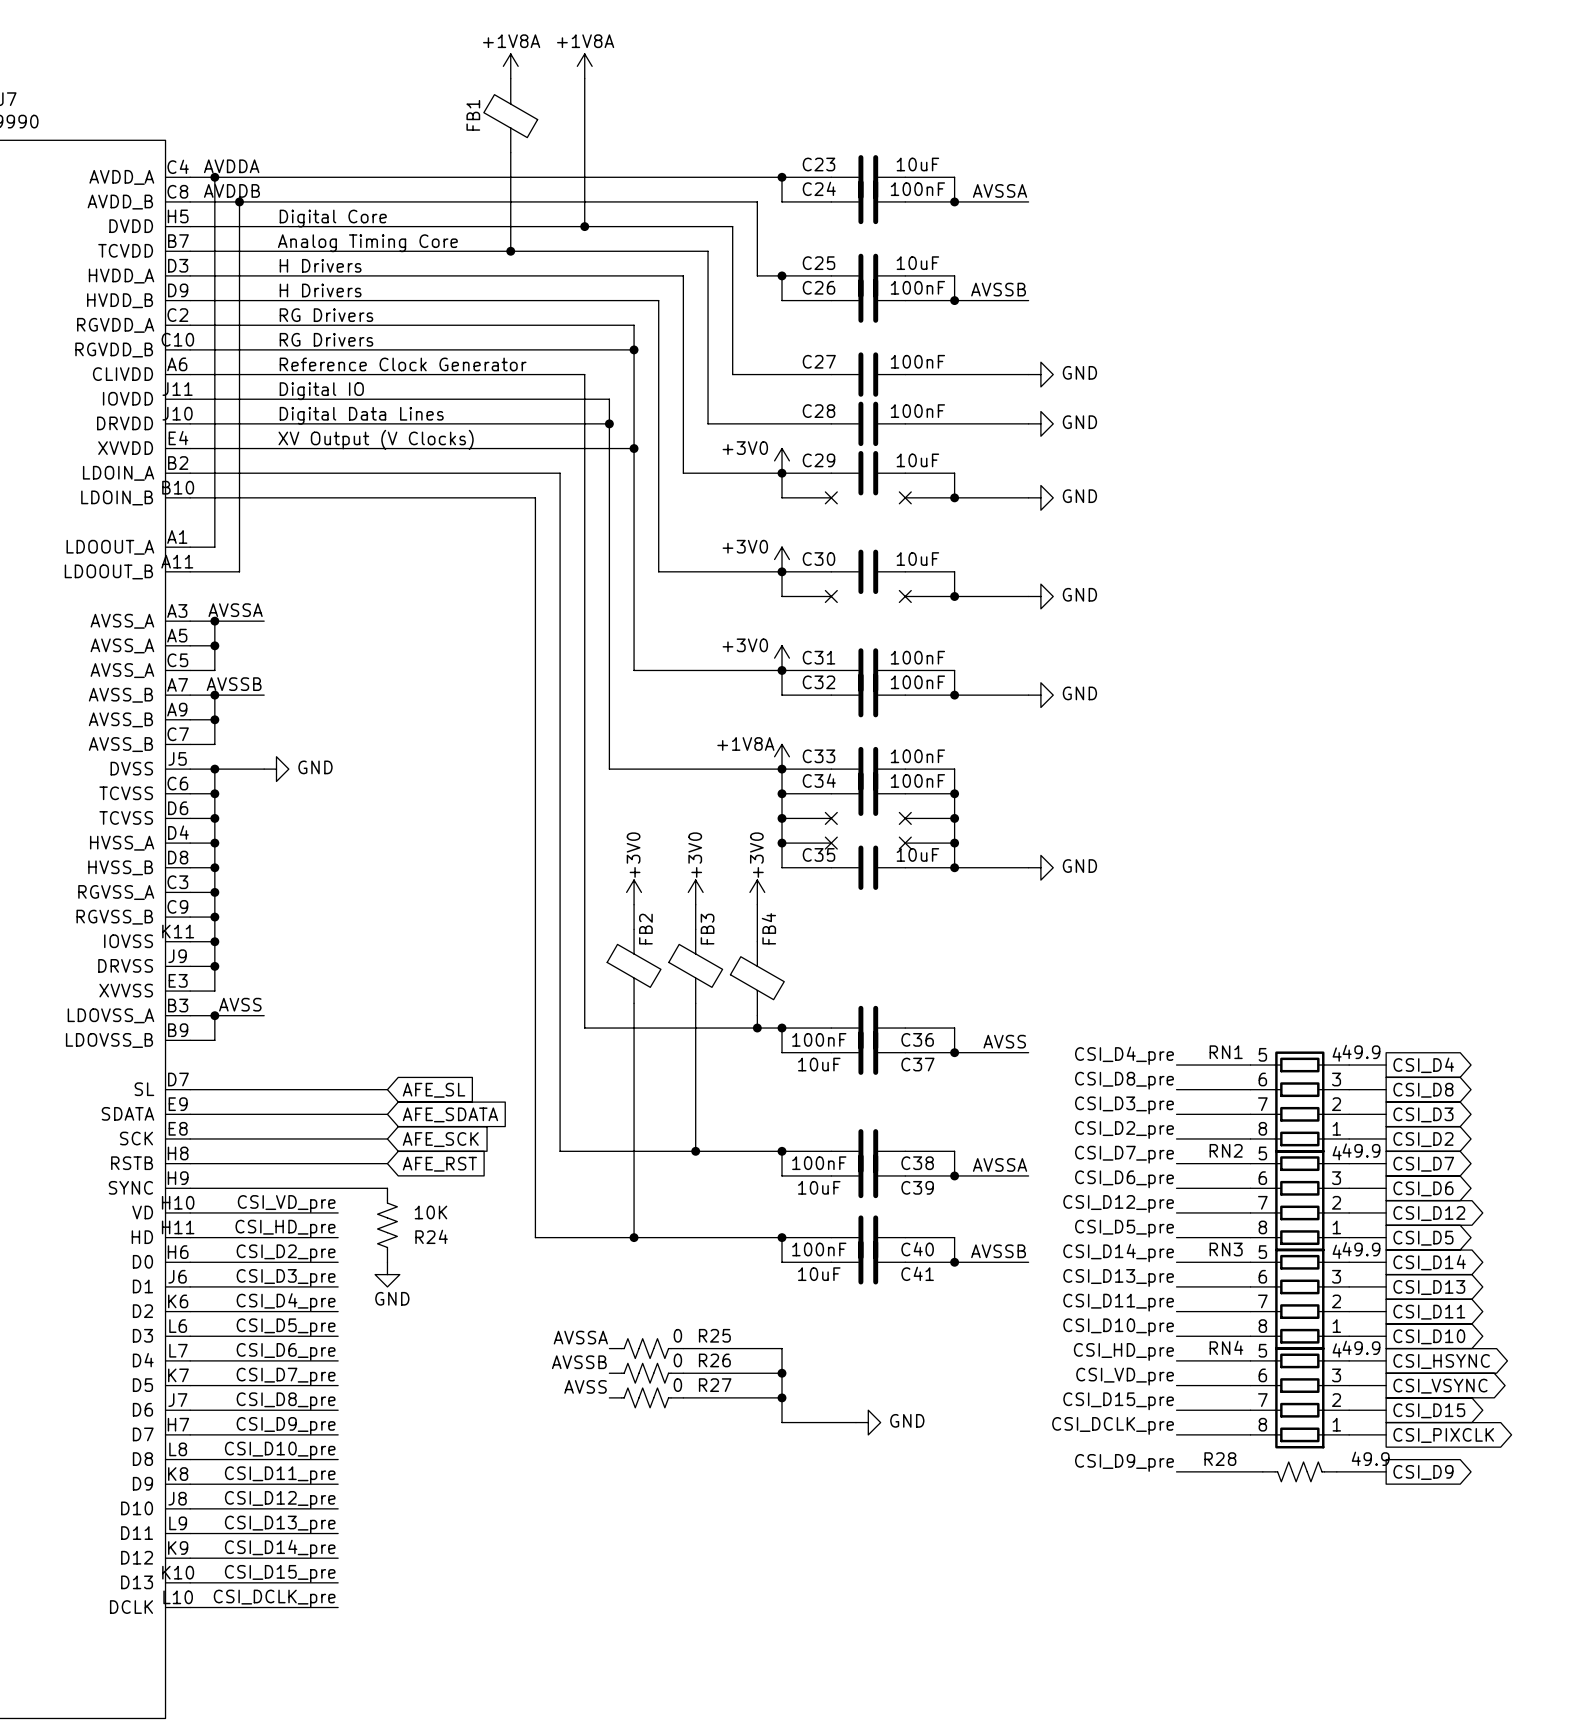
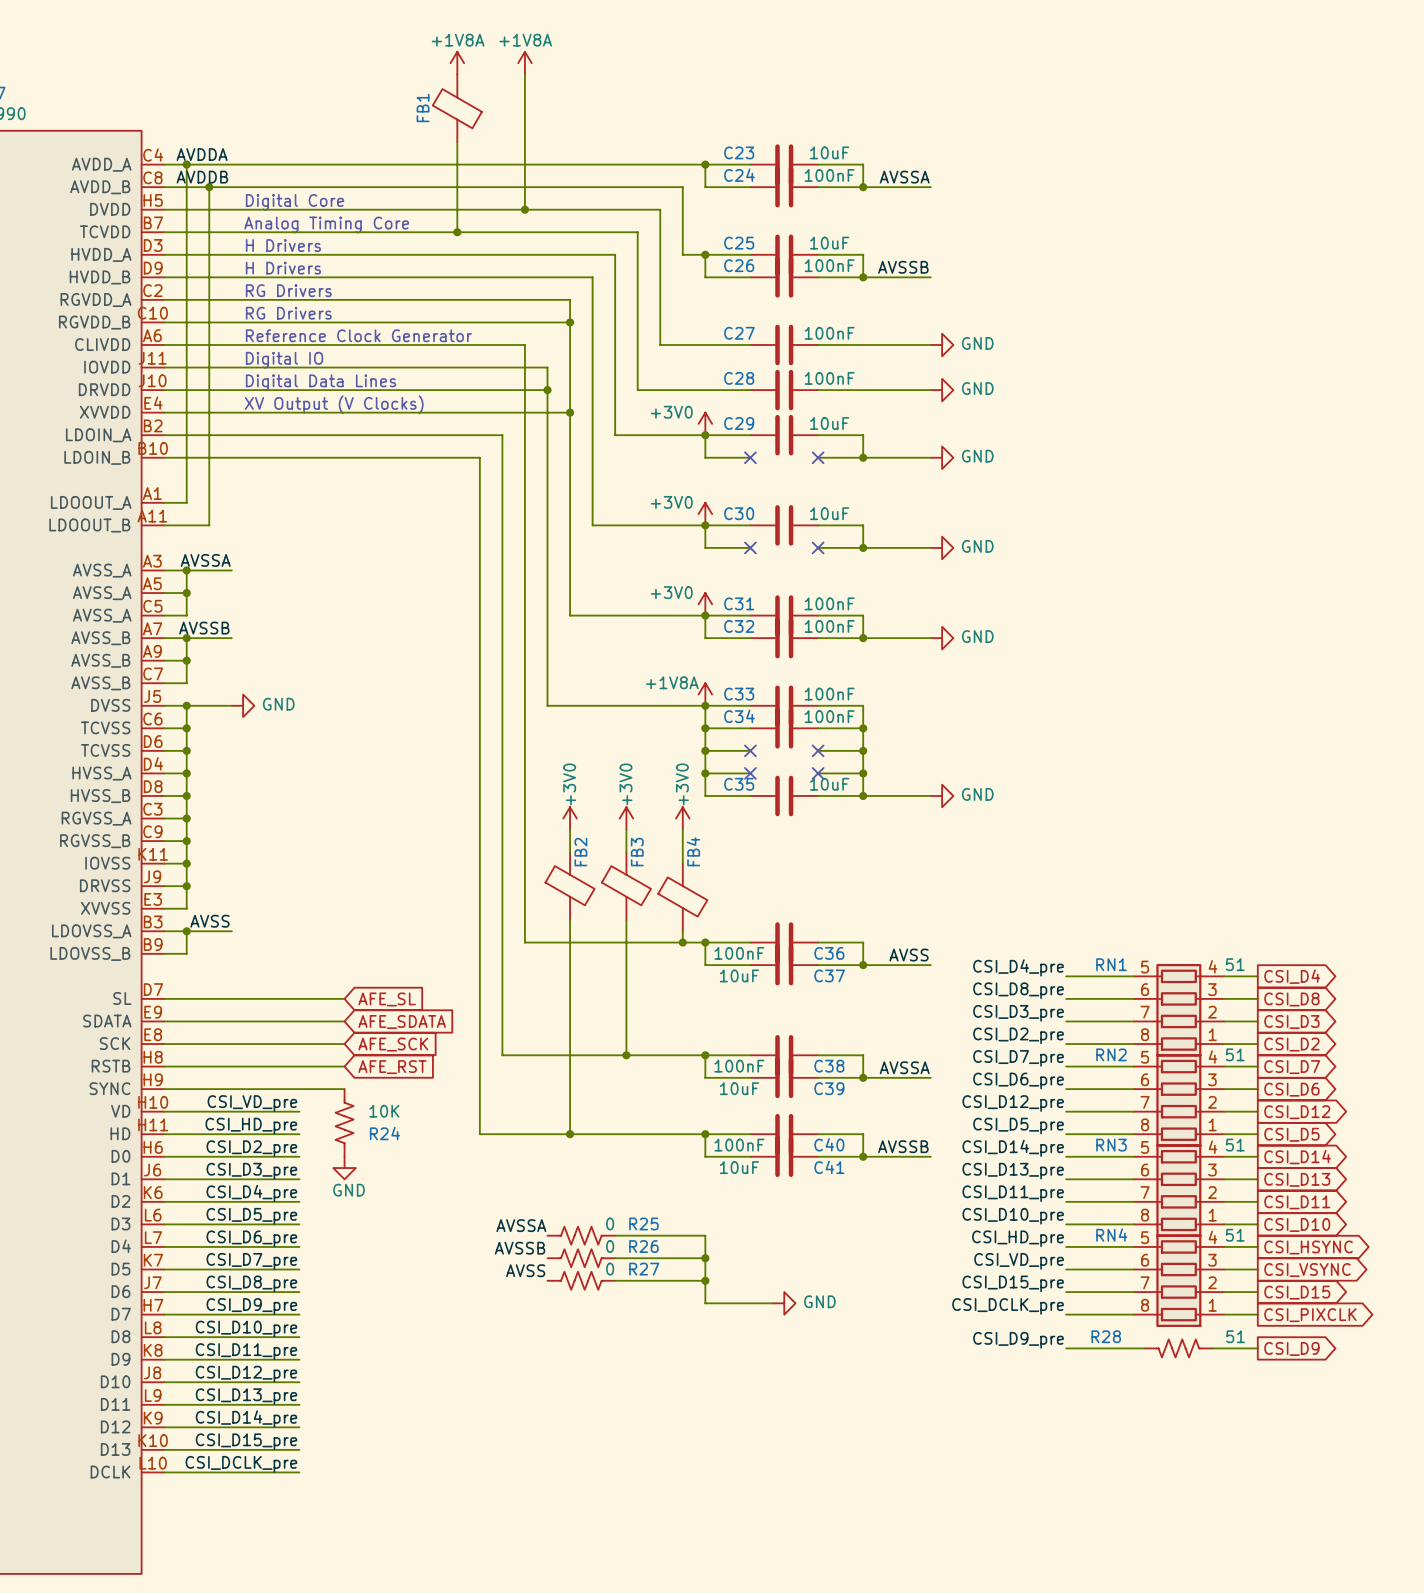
RN1 value: 49.9 (1361, 1051) -> 51 (1235, 964)
RN2 value: 49.9 (1361, 1150) -> 51 (1235, 1054)
RN3 value: 49.9 (1361, 1249) -> 51 (1235, 1145)
RN4 value: 49.9 (1361, 1347) -> 51 (1235, 1235)
R28 value: 49.9 (1370, 1458) -> 51 (1235, 1336)

